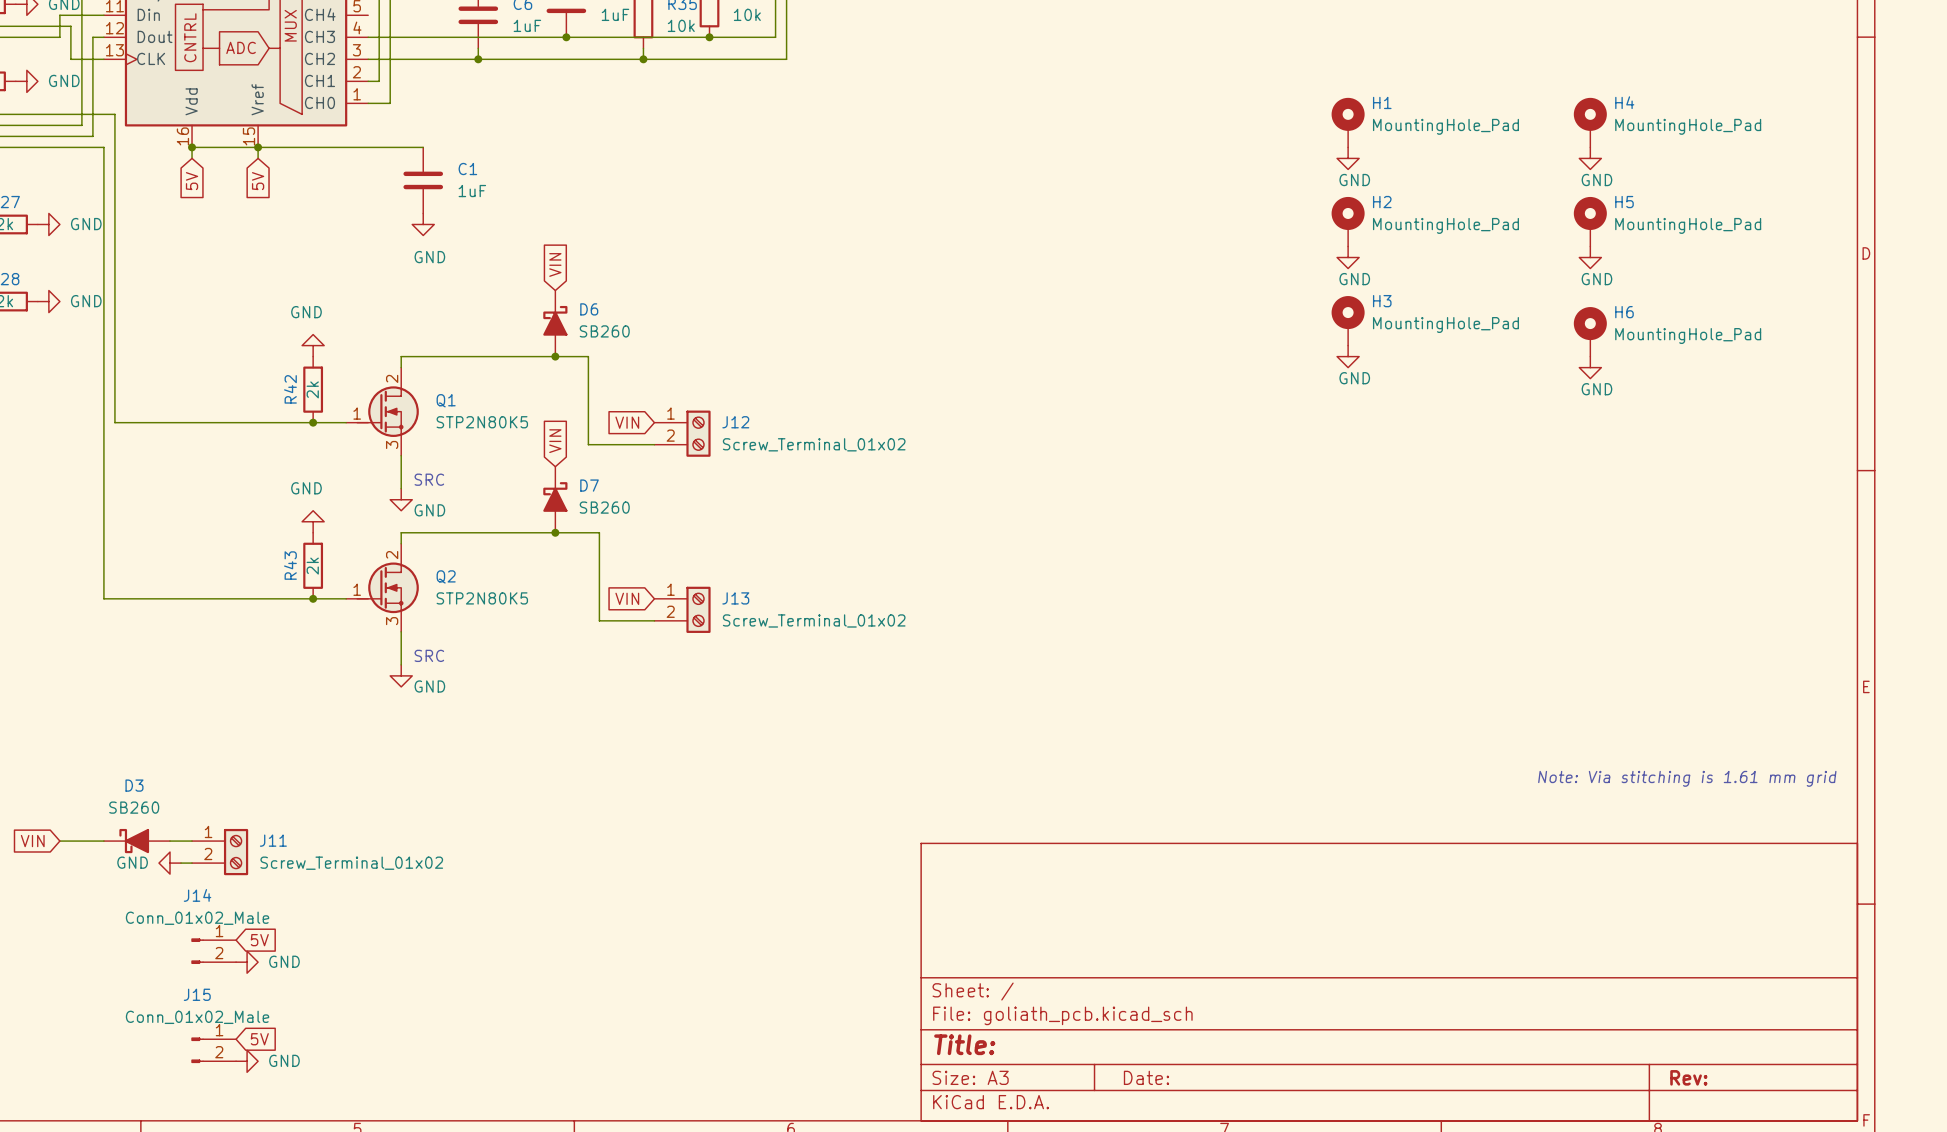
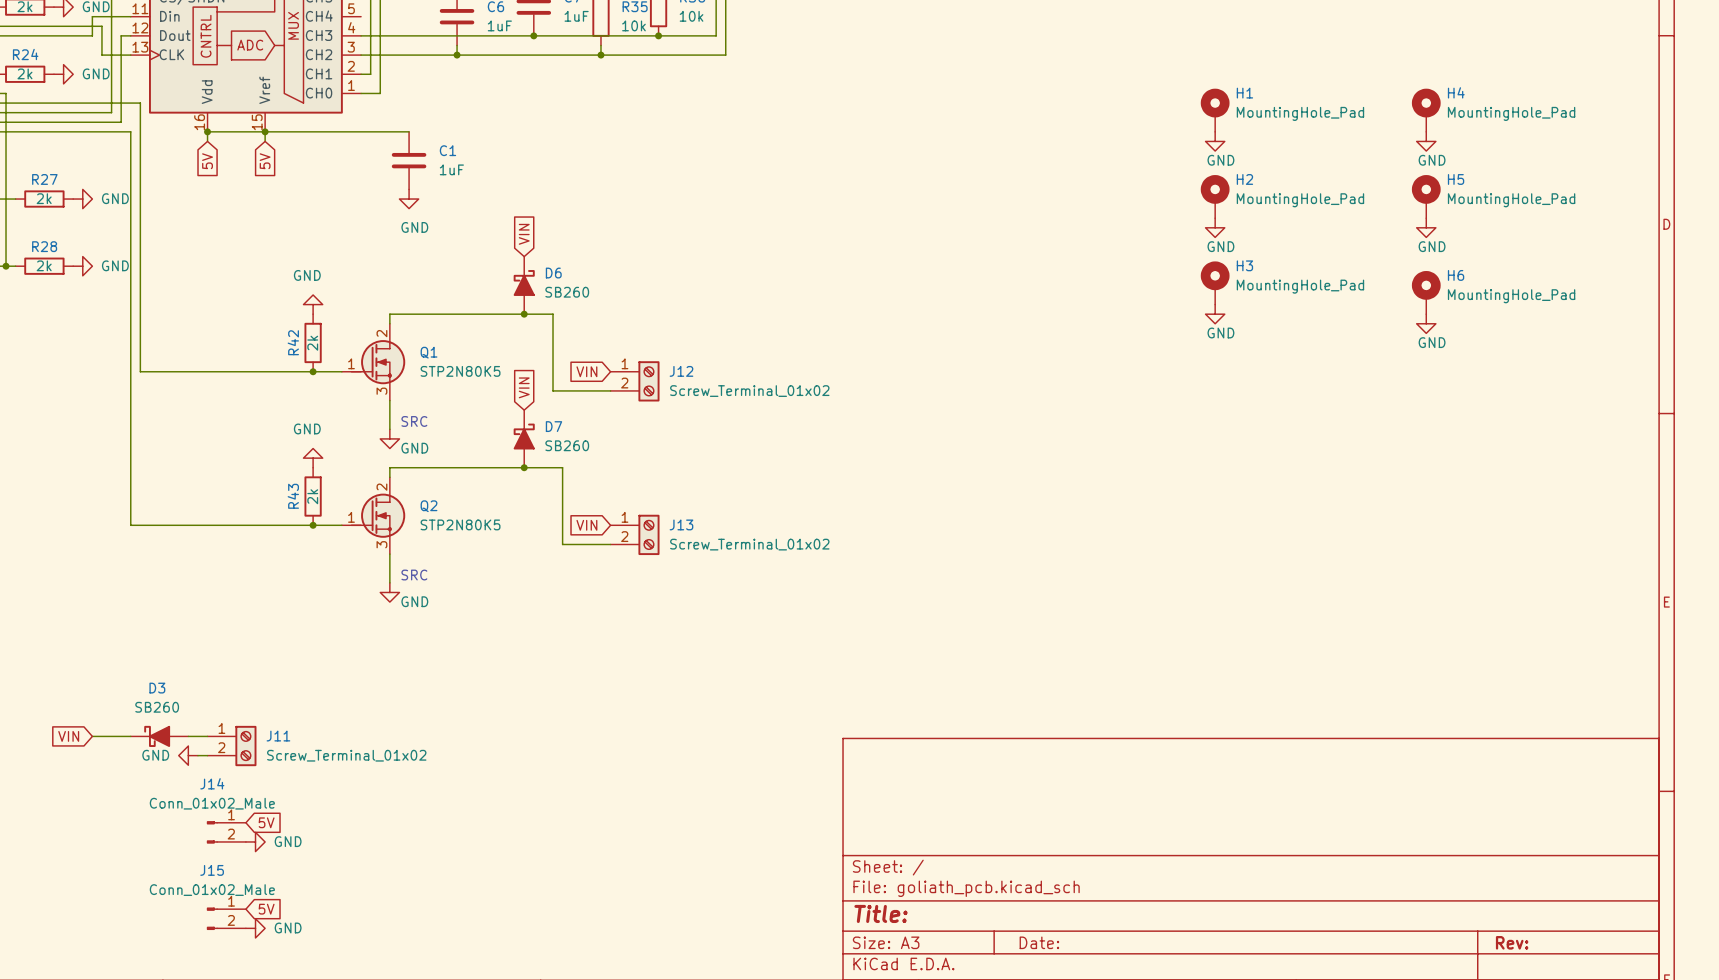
text: Note: Via stitching is 1.61 mm grid (1687, 778) -> none

